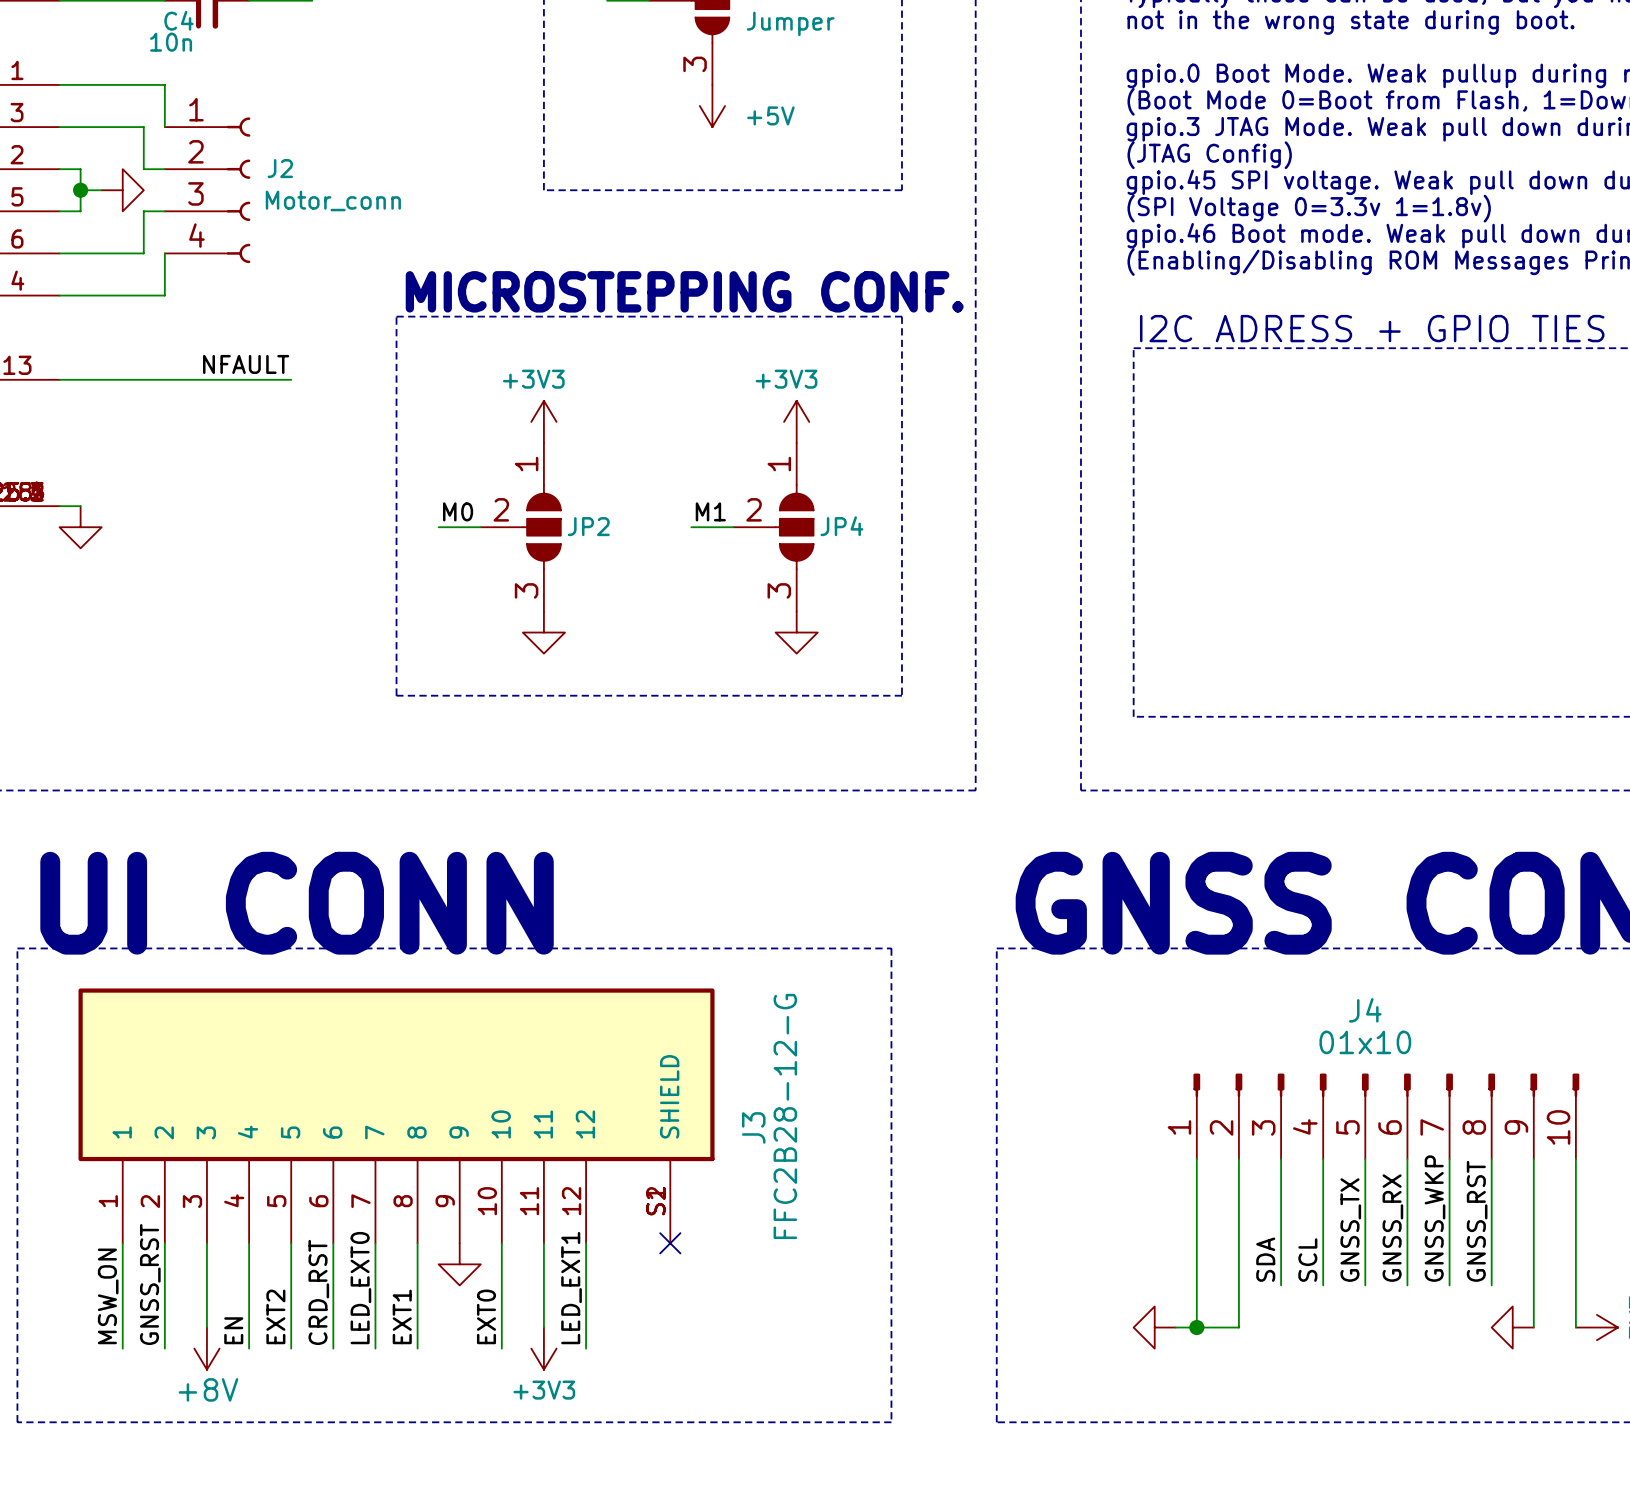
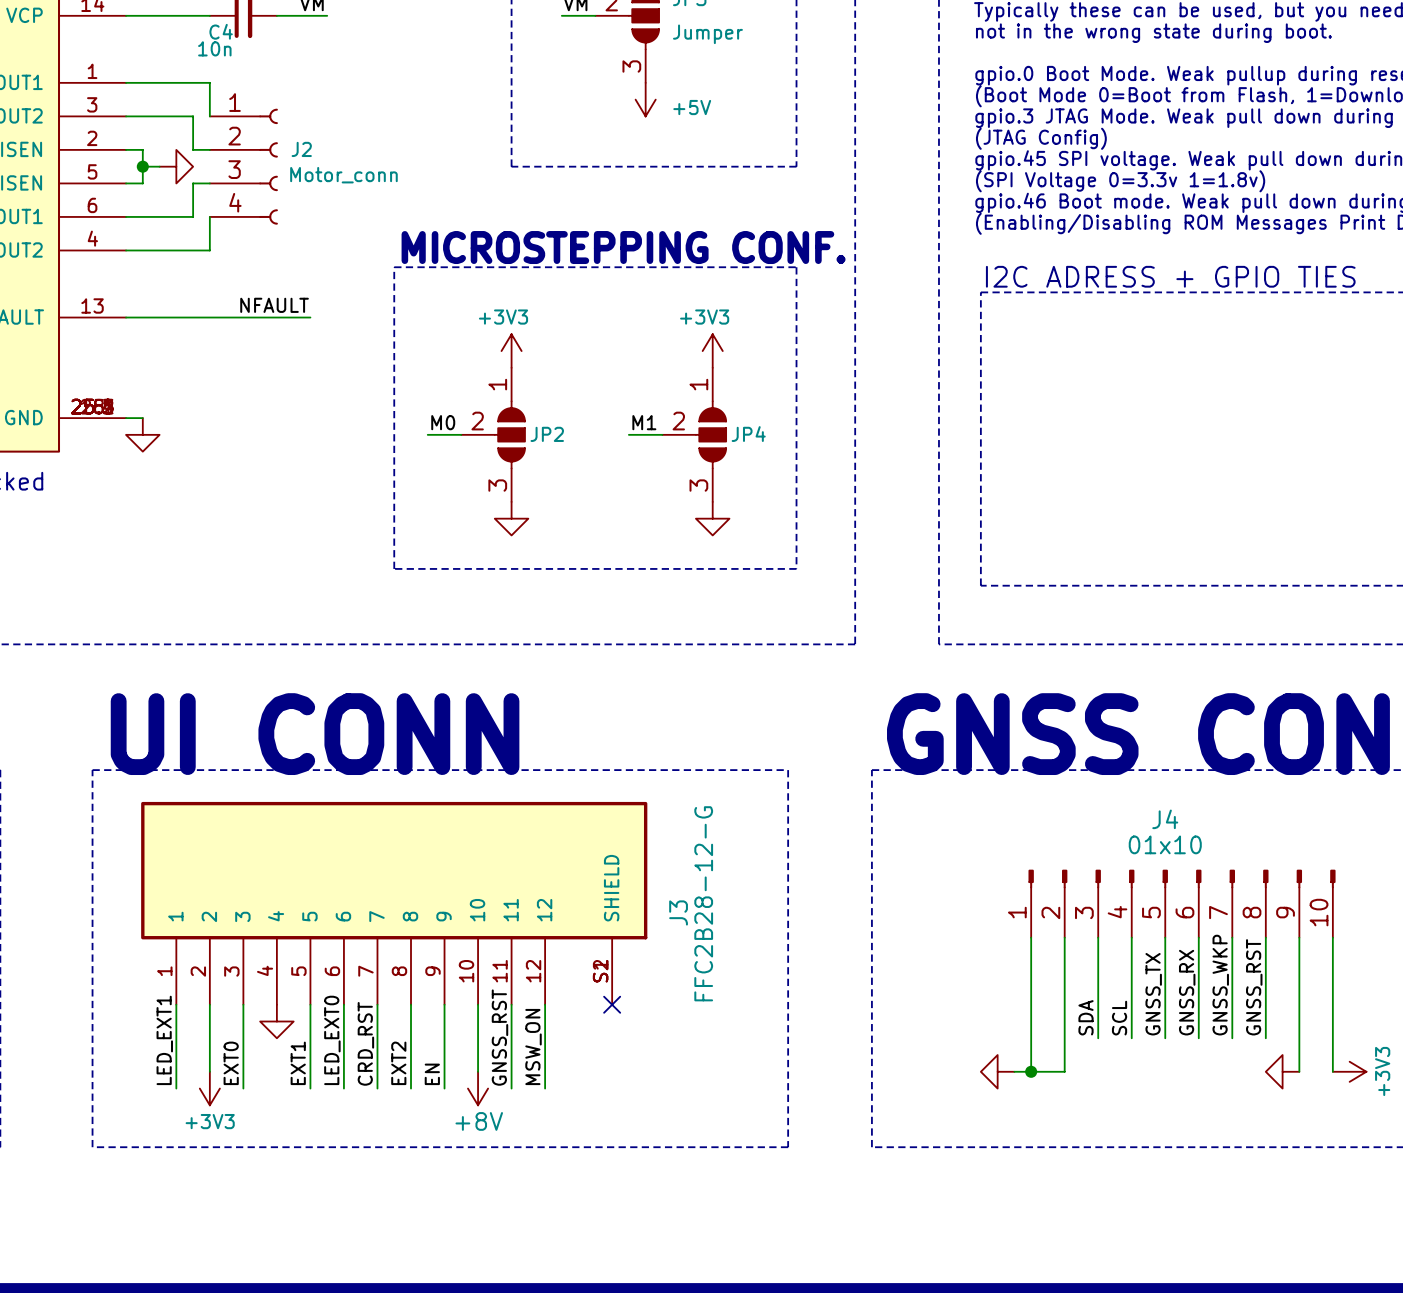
wire: (249, 1243) (249, 1348) -> (444, 1004) (444, 1088)
power symbol position: (459, 1264) -> (276, 1021)
label position: GNSS_RST (150, 1284) -> GNSS_RST (499, 1037)
label: LED_EXT0 (360, 1288) -> CRD_RST (365, 1043)
label: LED_EXT1 (571, 1288) -> MSW_ON (533, 1047)
label: CRD_RST (318, 1292) -> LED_EXT0 (332, 1040)
label: MSW_ON (108, 1296) -> LED_EXT1 (164, 1040)
label: EXT2 (275, 1316) -> EXT1 (298, 1063)
label: EXT1 (402, 1316) -> EXT2 (398, 1063)
label position: EXT0 (486, 1316) -> EXT0 (231, 1063)
label position: EN (233, 1330) -> EN (432, 1074)
power symbol position: +8V (206, 1348) -> +8V (478, 1088)
power symbol position: +3V3 (543, 1348) -> +3V3 (209, 1088)

